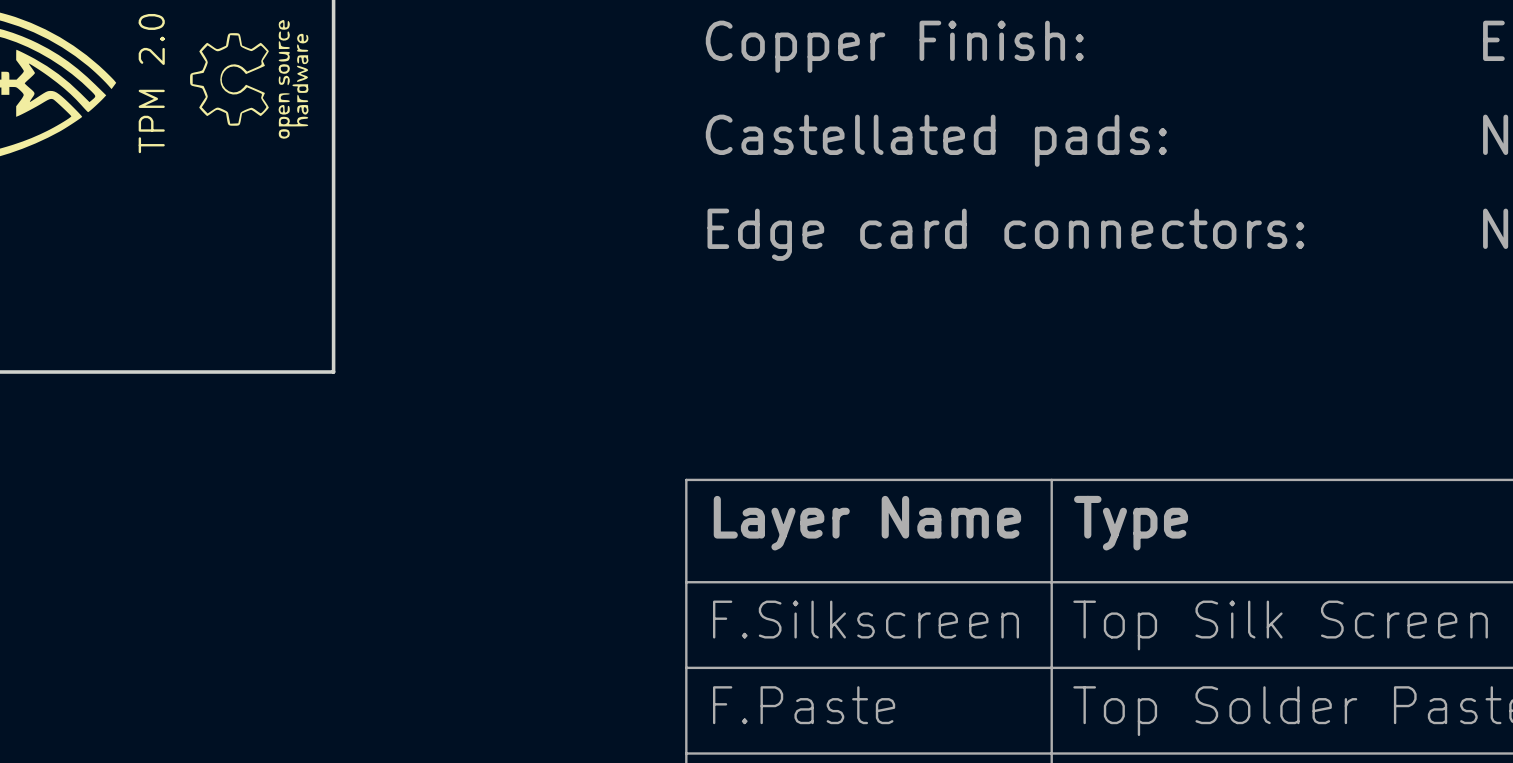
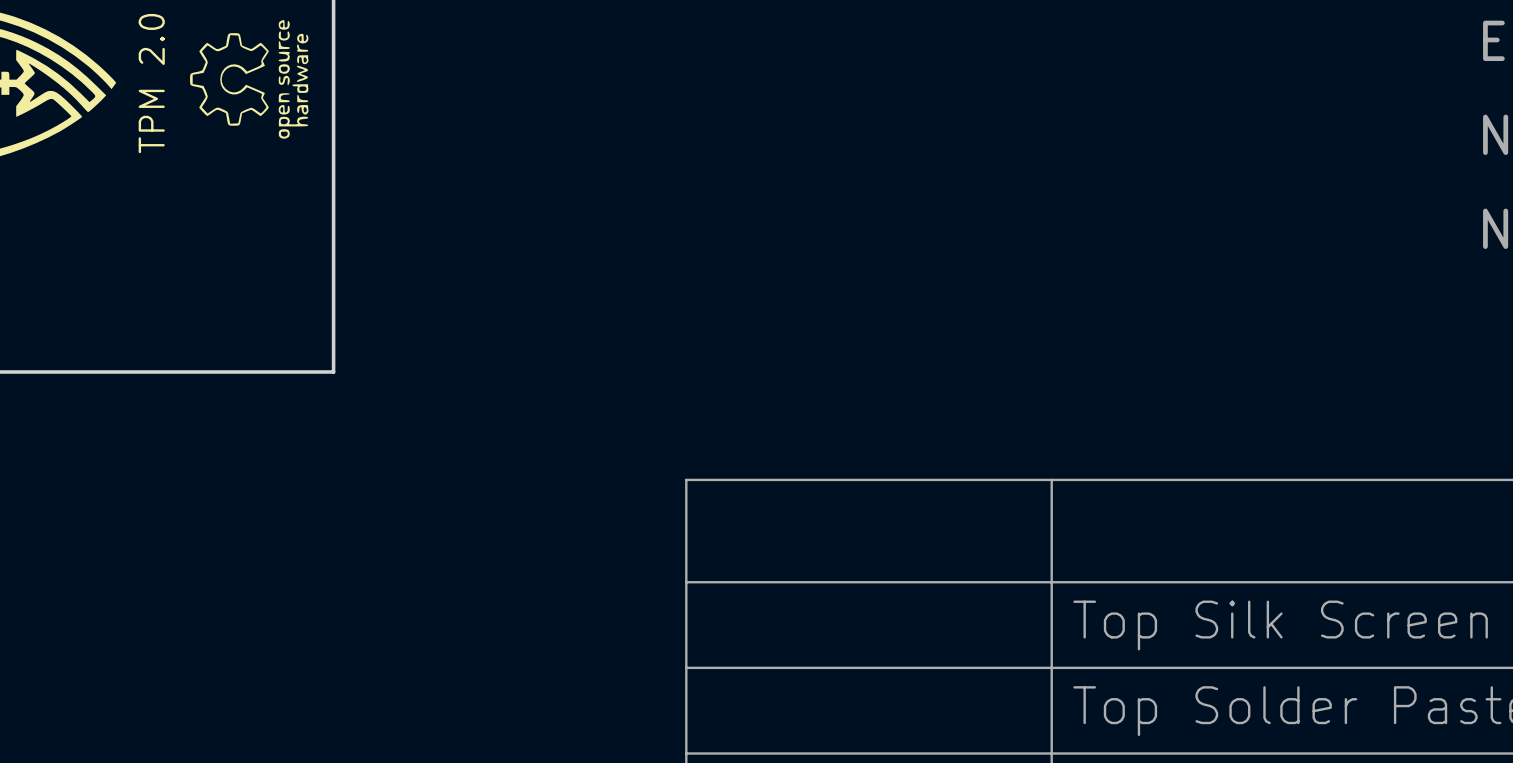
text: Copper Finish: (894, 46) -> none
text: Castellated pads: (936, 140) -> none
text: Edge card connectors: (1005, 234) -> none
text: Layer Name (867, 523) -> none
text: Type (1131, 523) -> none
text: F.Silkscreen (866, 619) -> none
text: F.Paste (804, 705) -> none

